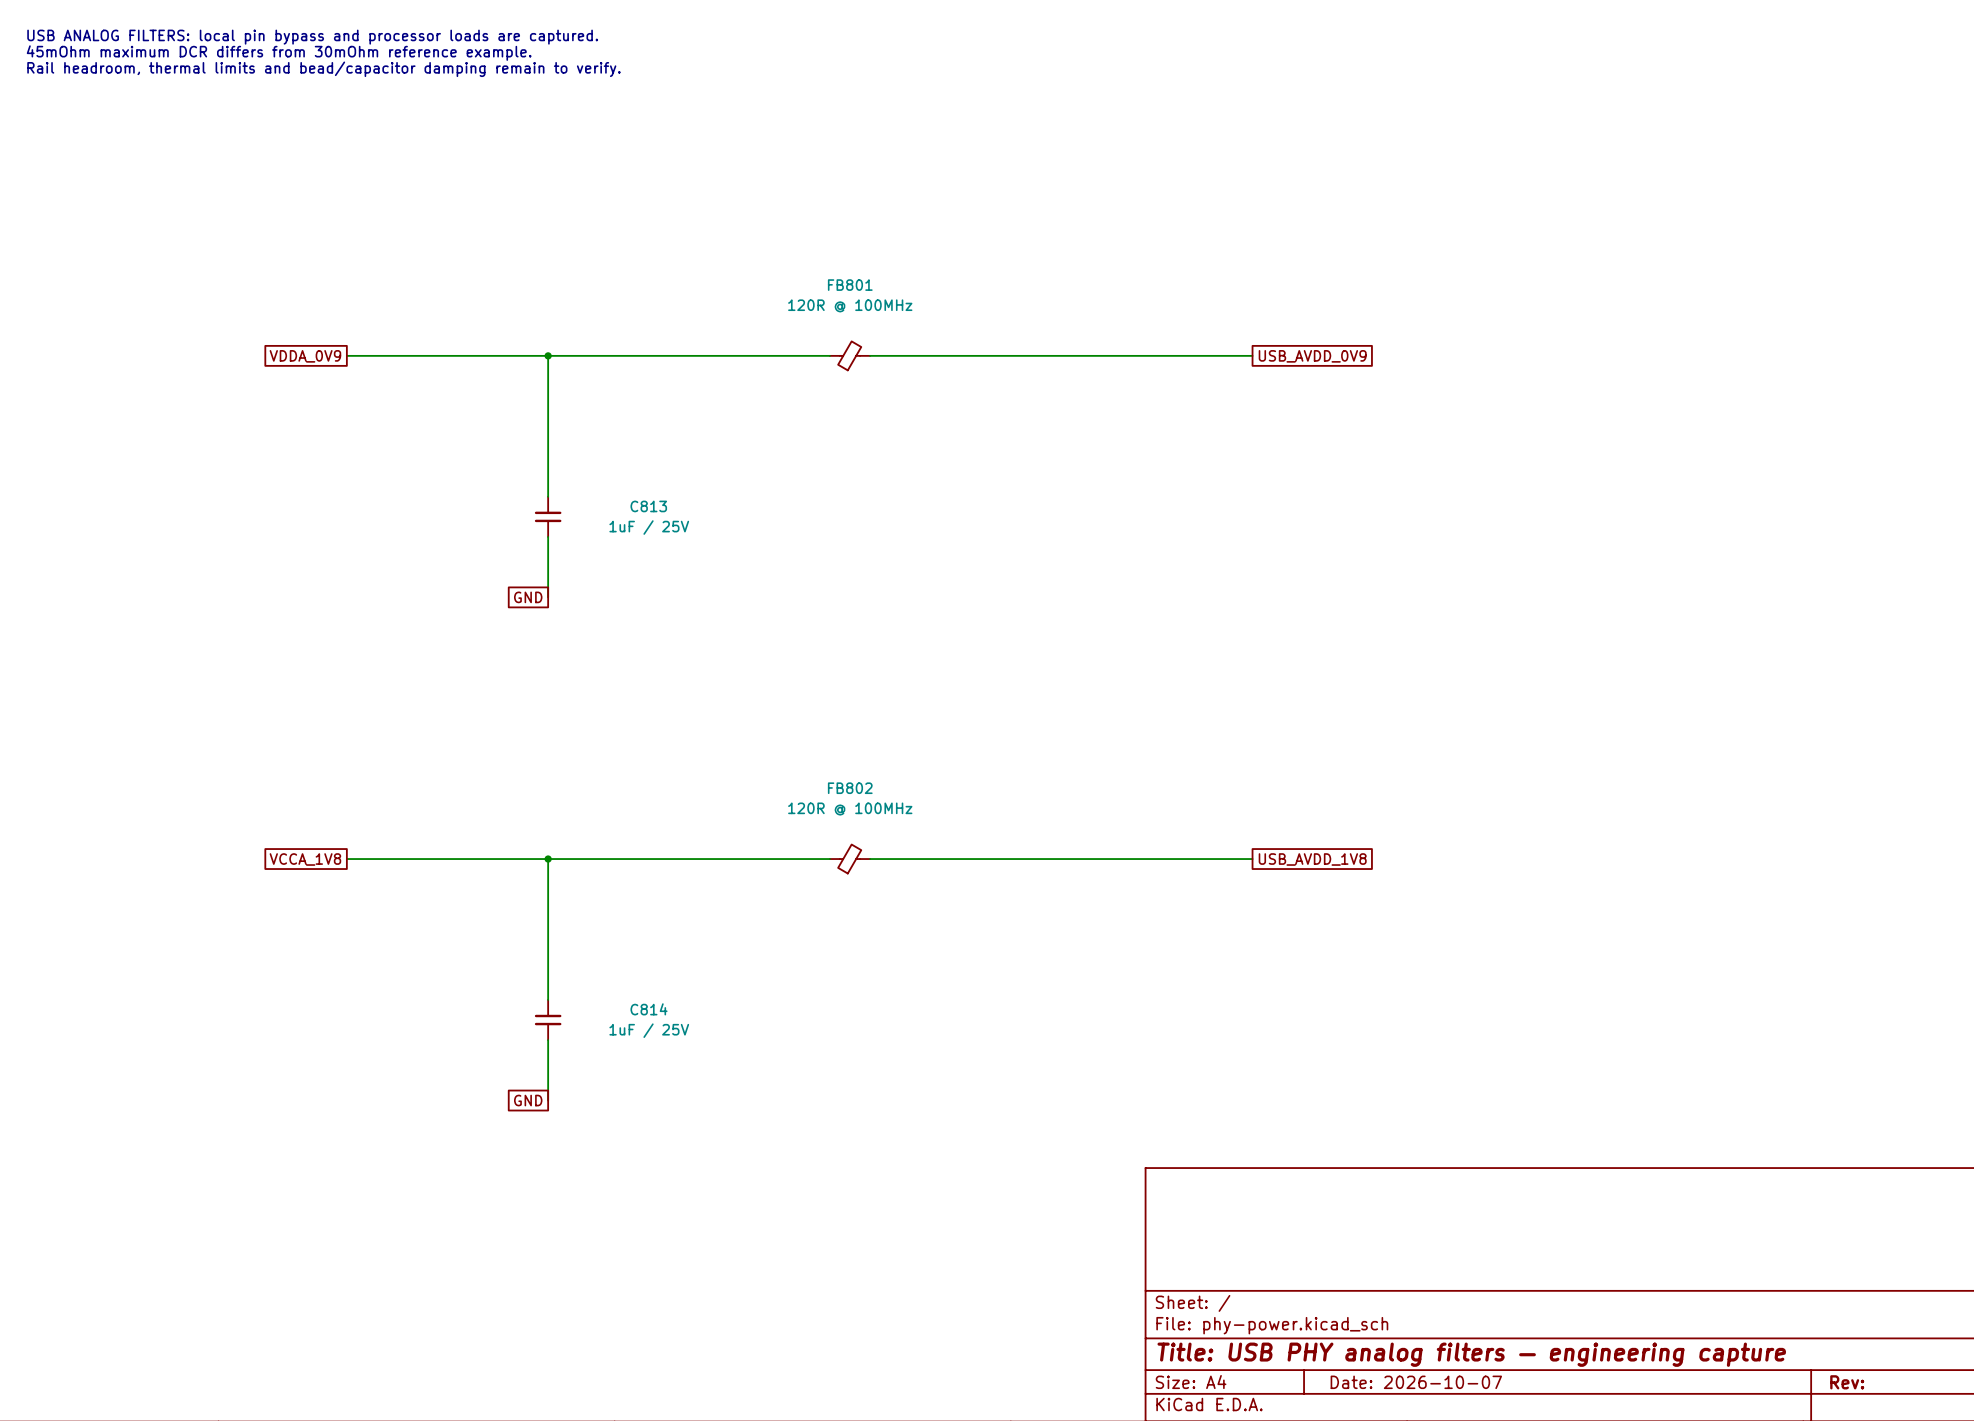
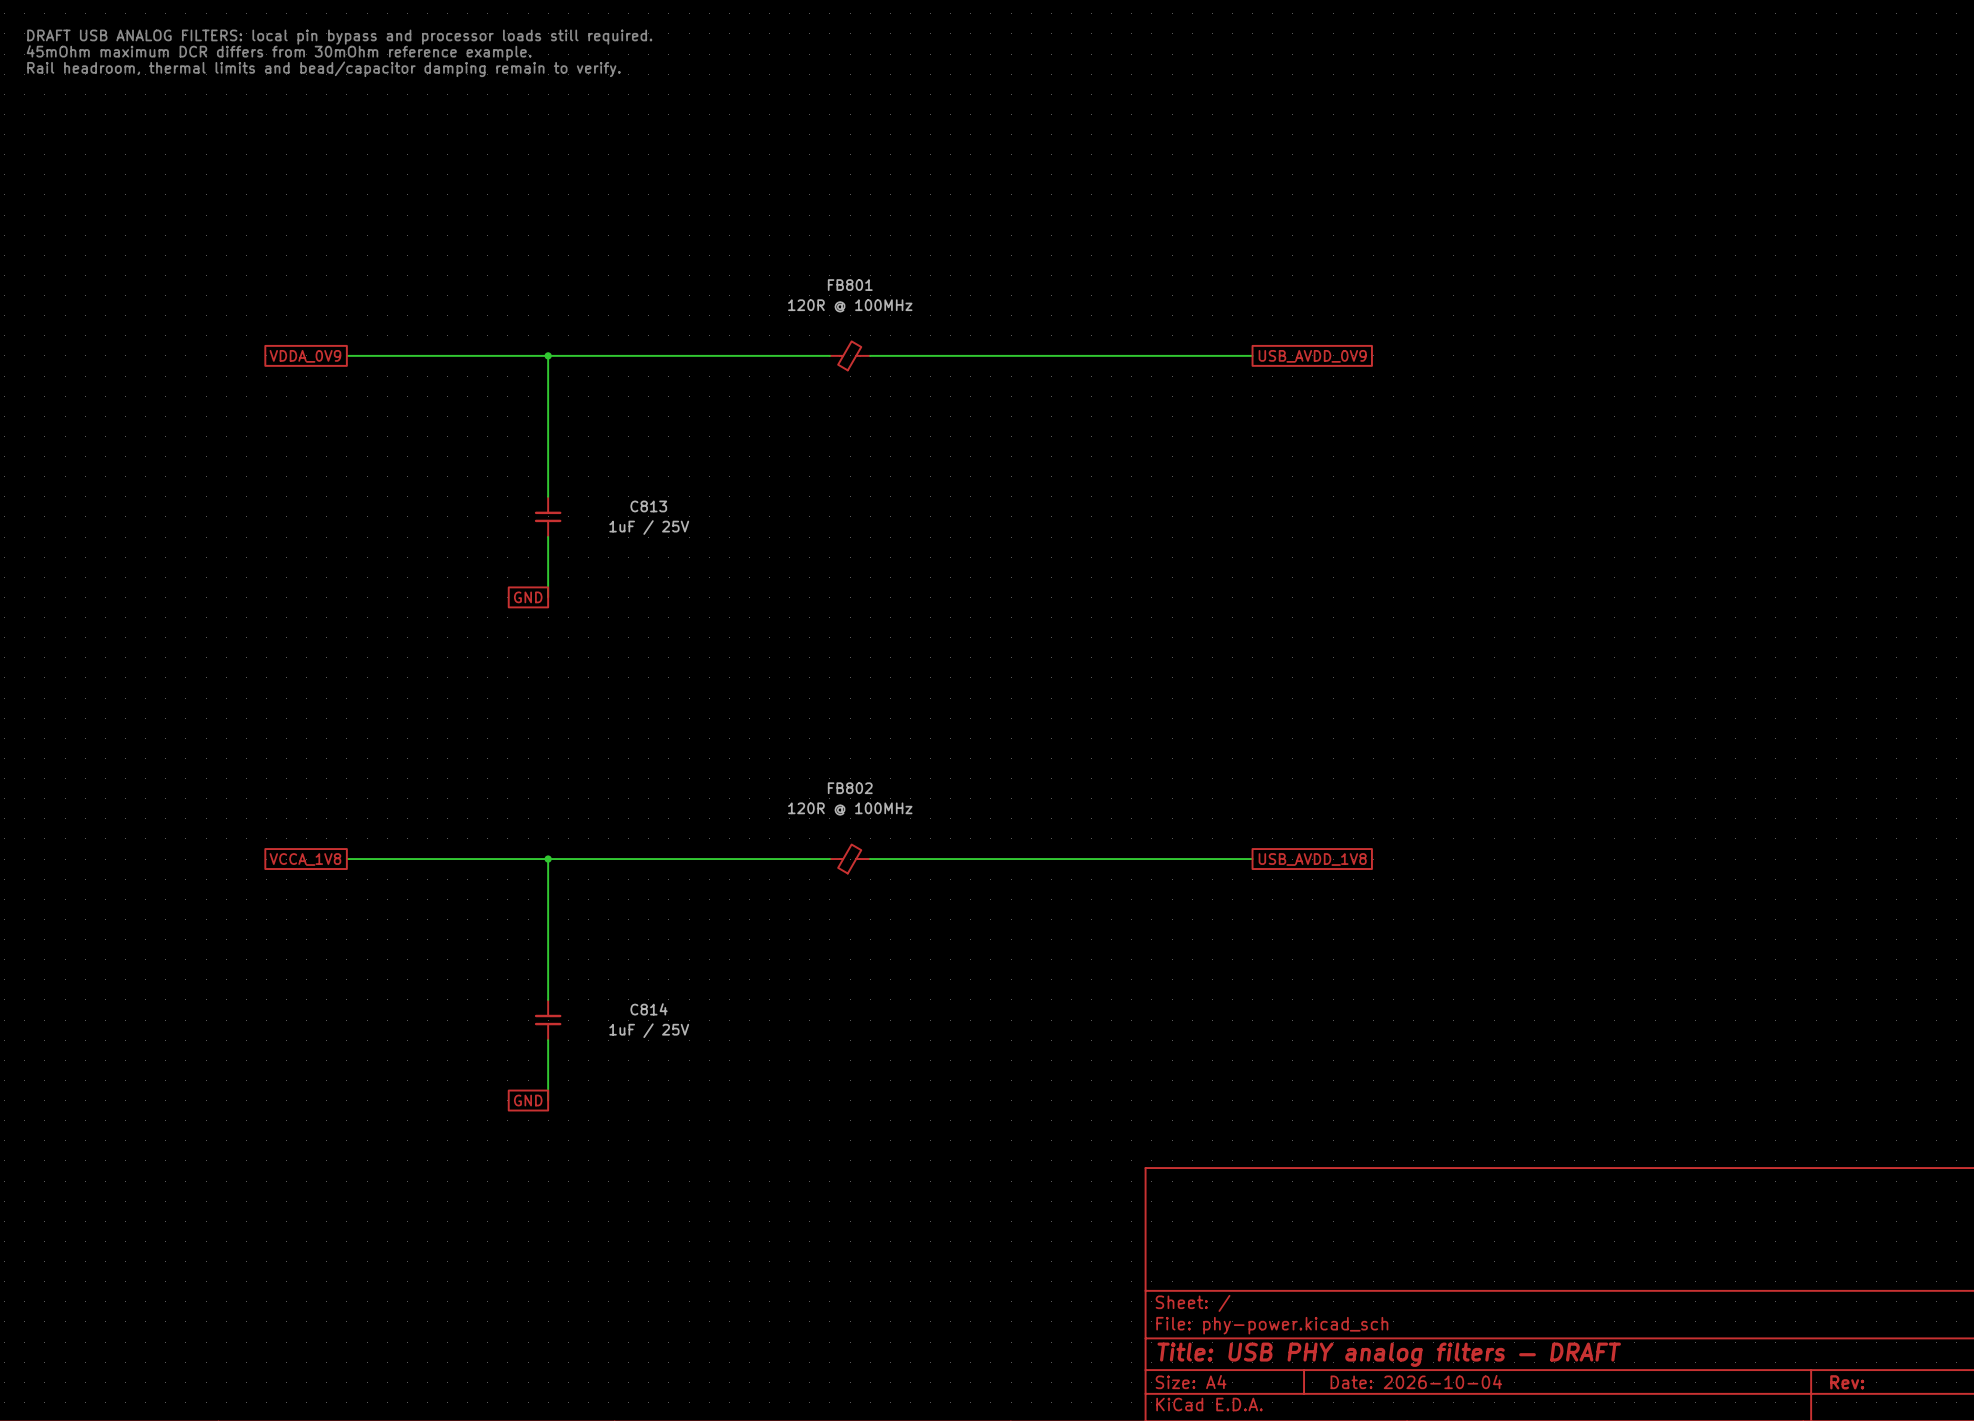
text: USB ANALOG FILTERS: local pin bypass and processor loads are captured. (312, 37) -> DRAFT USB ANALOG FILTERS: local pin bypass and processor loads still required. (339, 37)
title block: Title: USB PHY analog filters — engineering capture (1471, 1354) -> Title: USB PHY analog filters — DRAFT (1389, 1354)
title block: Date: 2026-10-07 (1416, 1382) -> Date: 2026-10-04 (1416, 1382)

